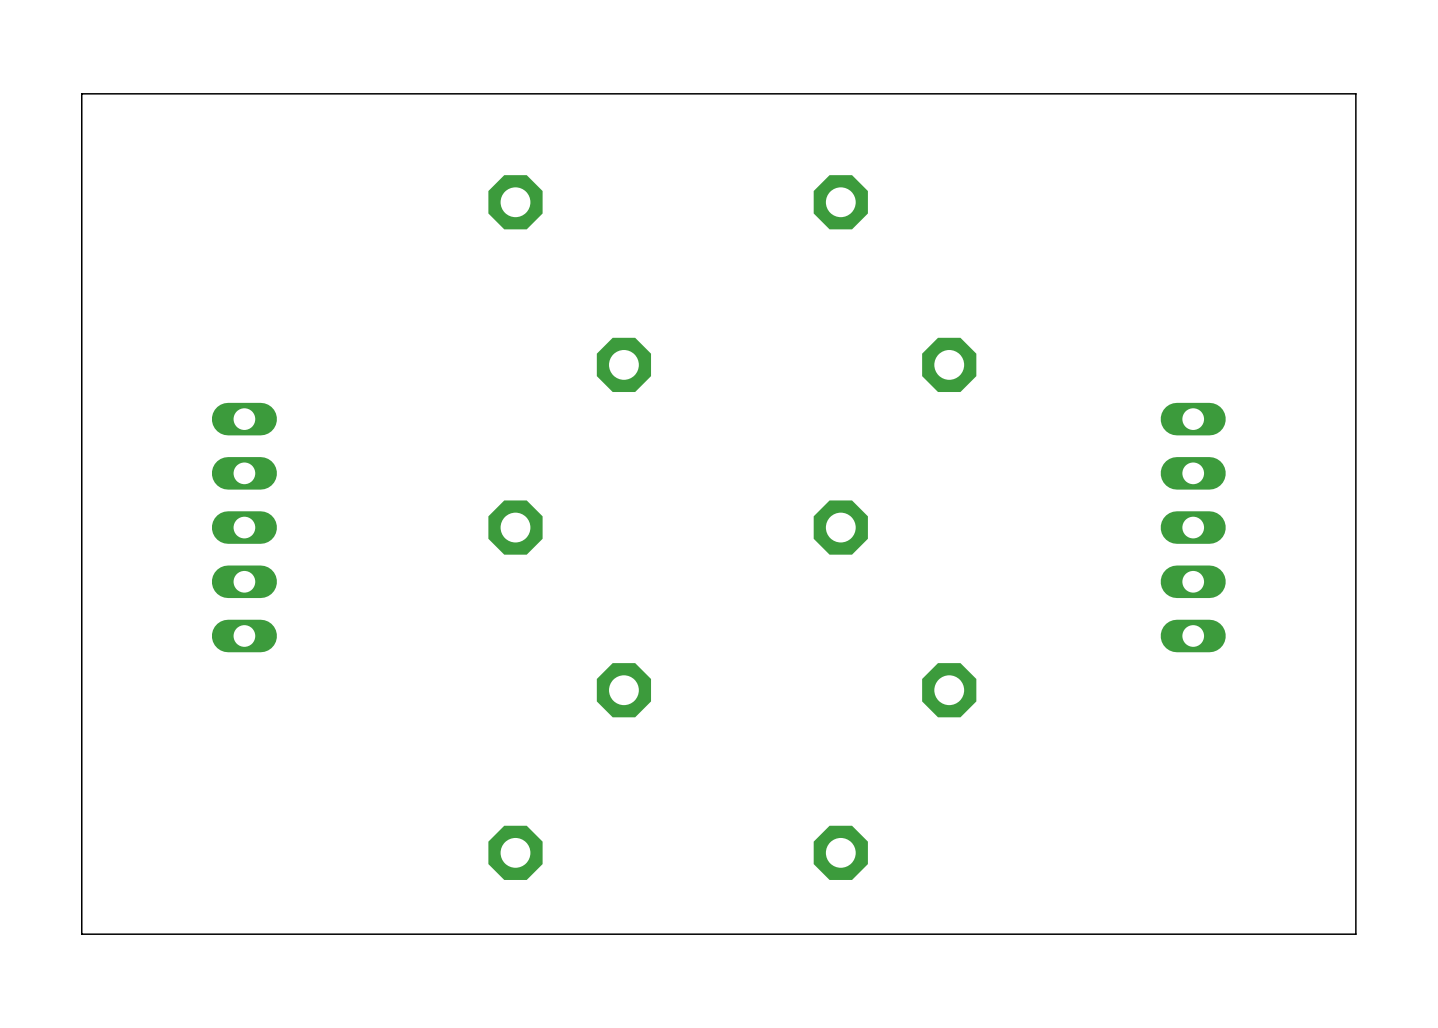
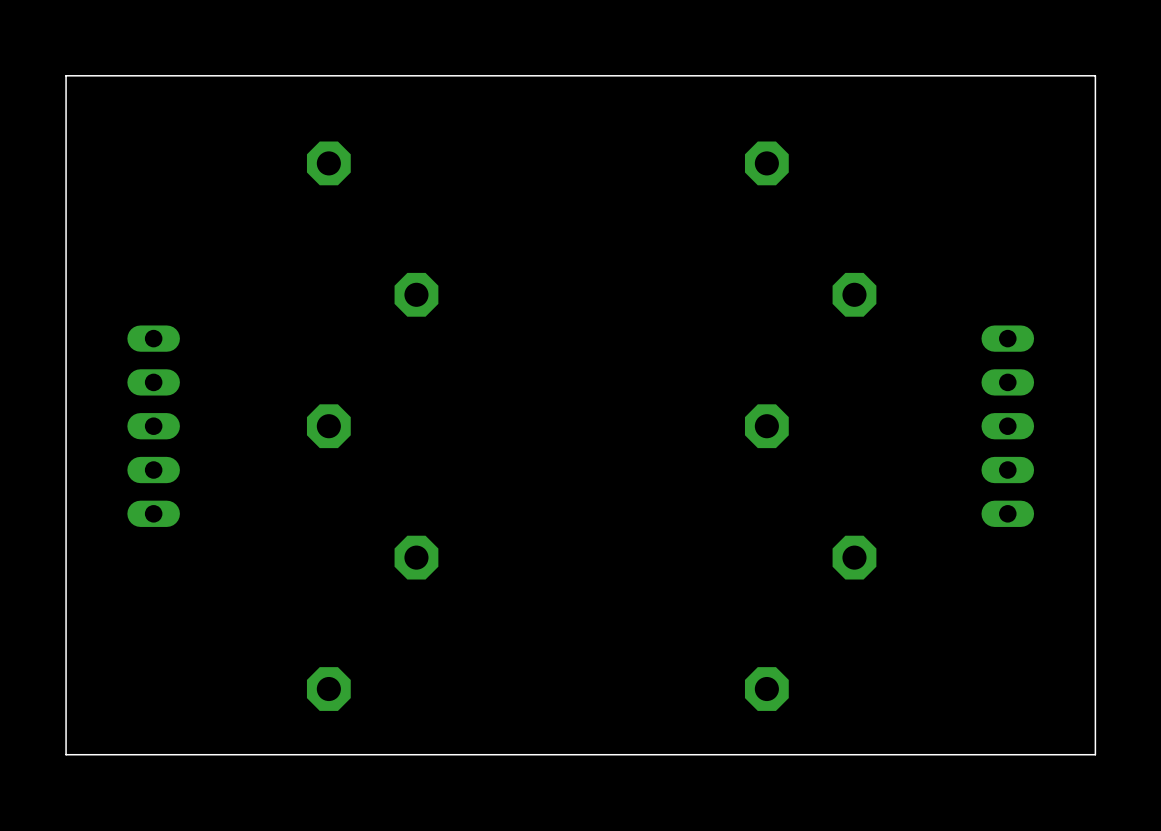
part: none -> (328, 163)
part: (515, 202) -> none
part: (840, 202) -> none
part: none -> (766, 163)
part: none -> (416, 294)
part: (623, 364) -> none
part: (949, 364) -> none
part: none -> (854, 294)
part position: (244, 527) -> (153, 426)
part: none -> (328, 426)
part: (515, 527) -> none
part: (840, 527) -> none
part: none -> (766, 426)
part position: (1193, 527) -> (1007, 426)
part: none -> (416, 557)
part: (623, 690) -> none
part: (949, 690) -> none
part: none -> (854, 557)
part: none -> (328, 689)
part: (515, 852) -> none
part: (840, 852) -> none
part: none -> (766, 689)

